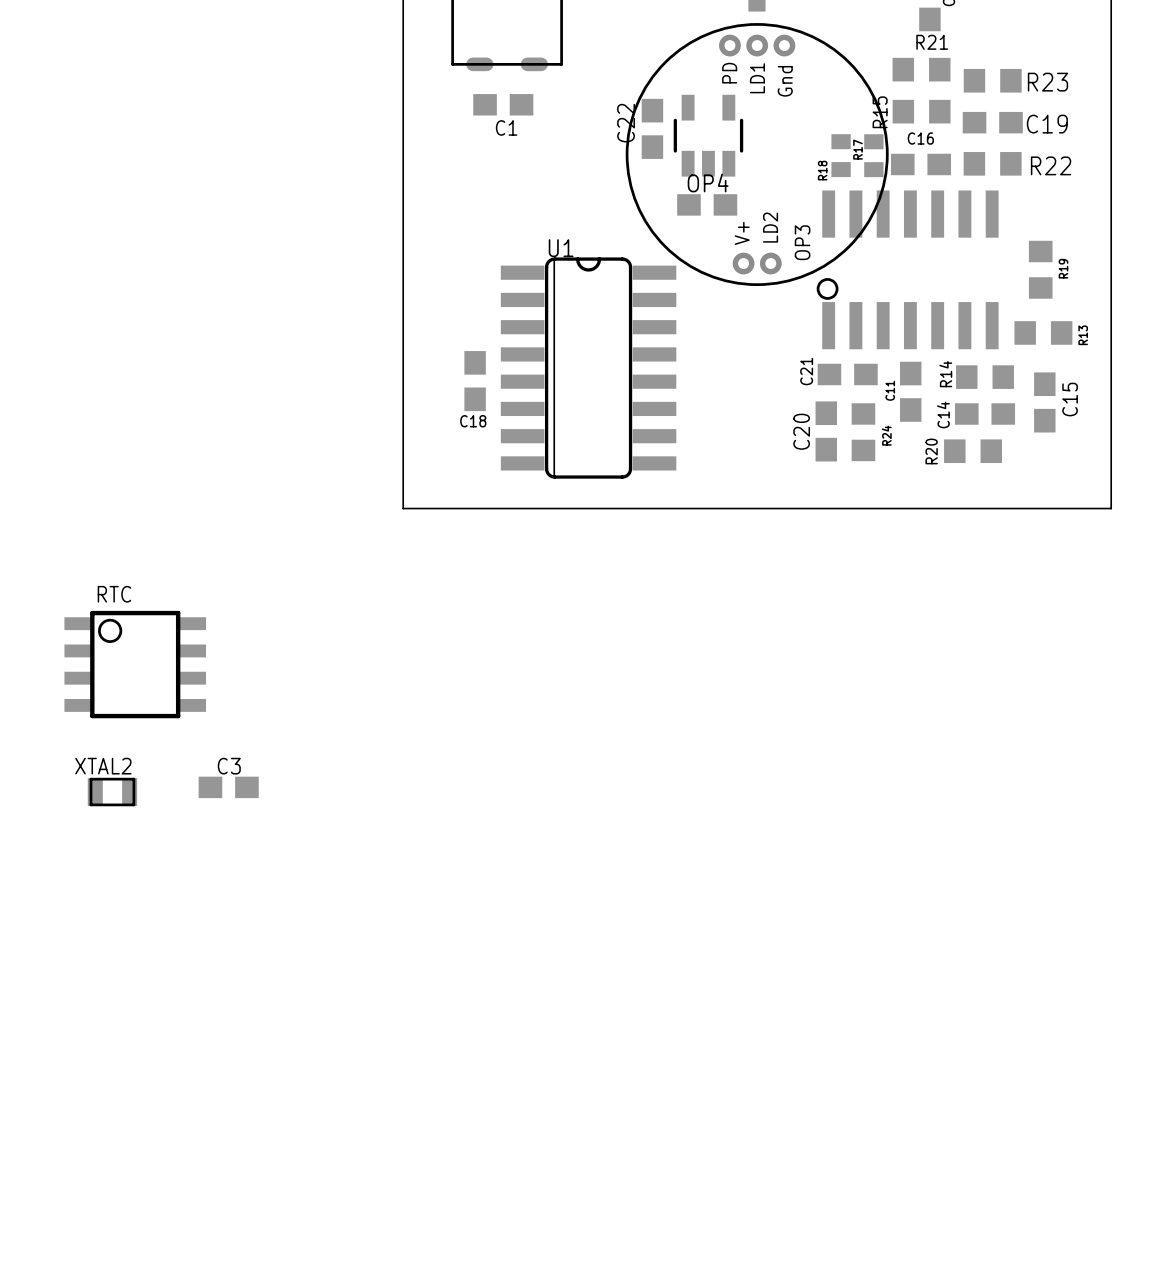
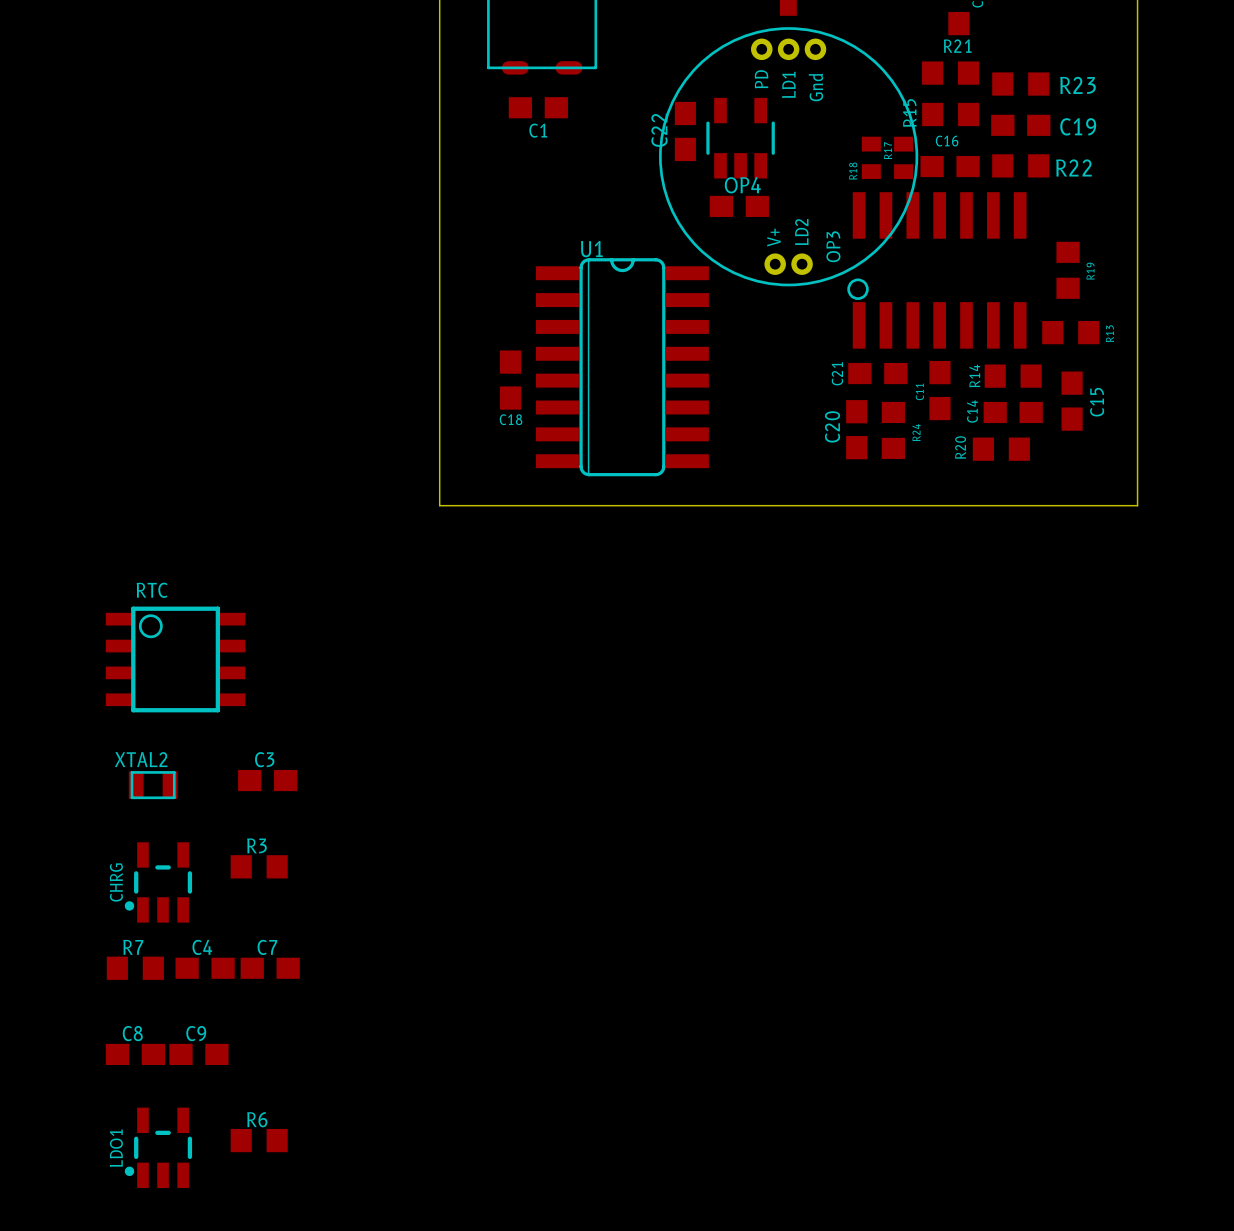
R3: none -> (259, 866)
CHRG: none -> (158, 882)
R7: none -> (135, 968)
C4: none -> (205, 968)
C7: none -> (270, 968)
C8: none -> (135, 1054)
C9: none -> (198, 1054)
R6: none -> (259, 1140)
LDO1: none -> (158, 1147)

